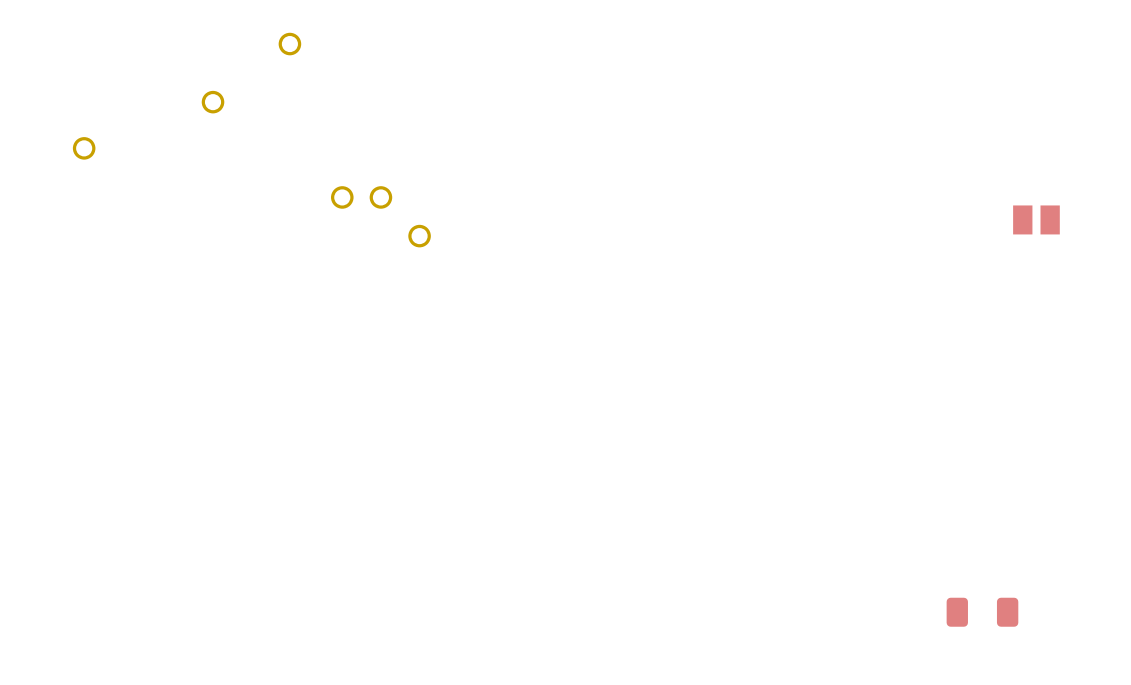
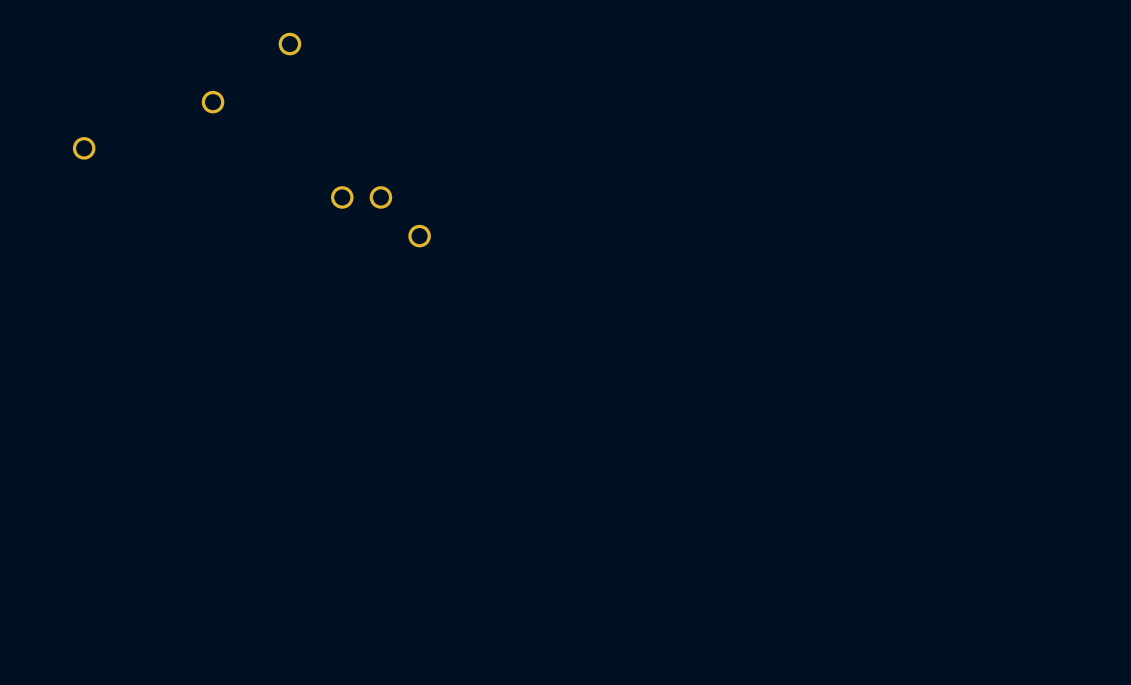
part: (1036, 219) -> none
part: (982, 612) -> none

